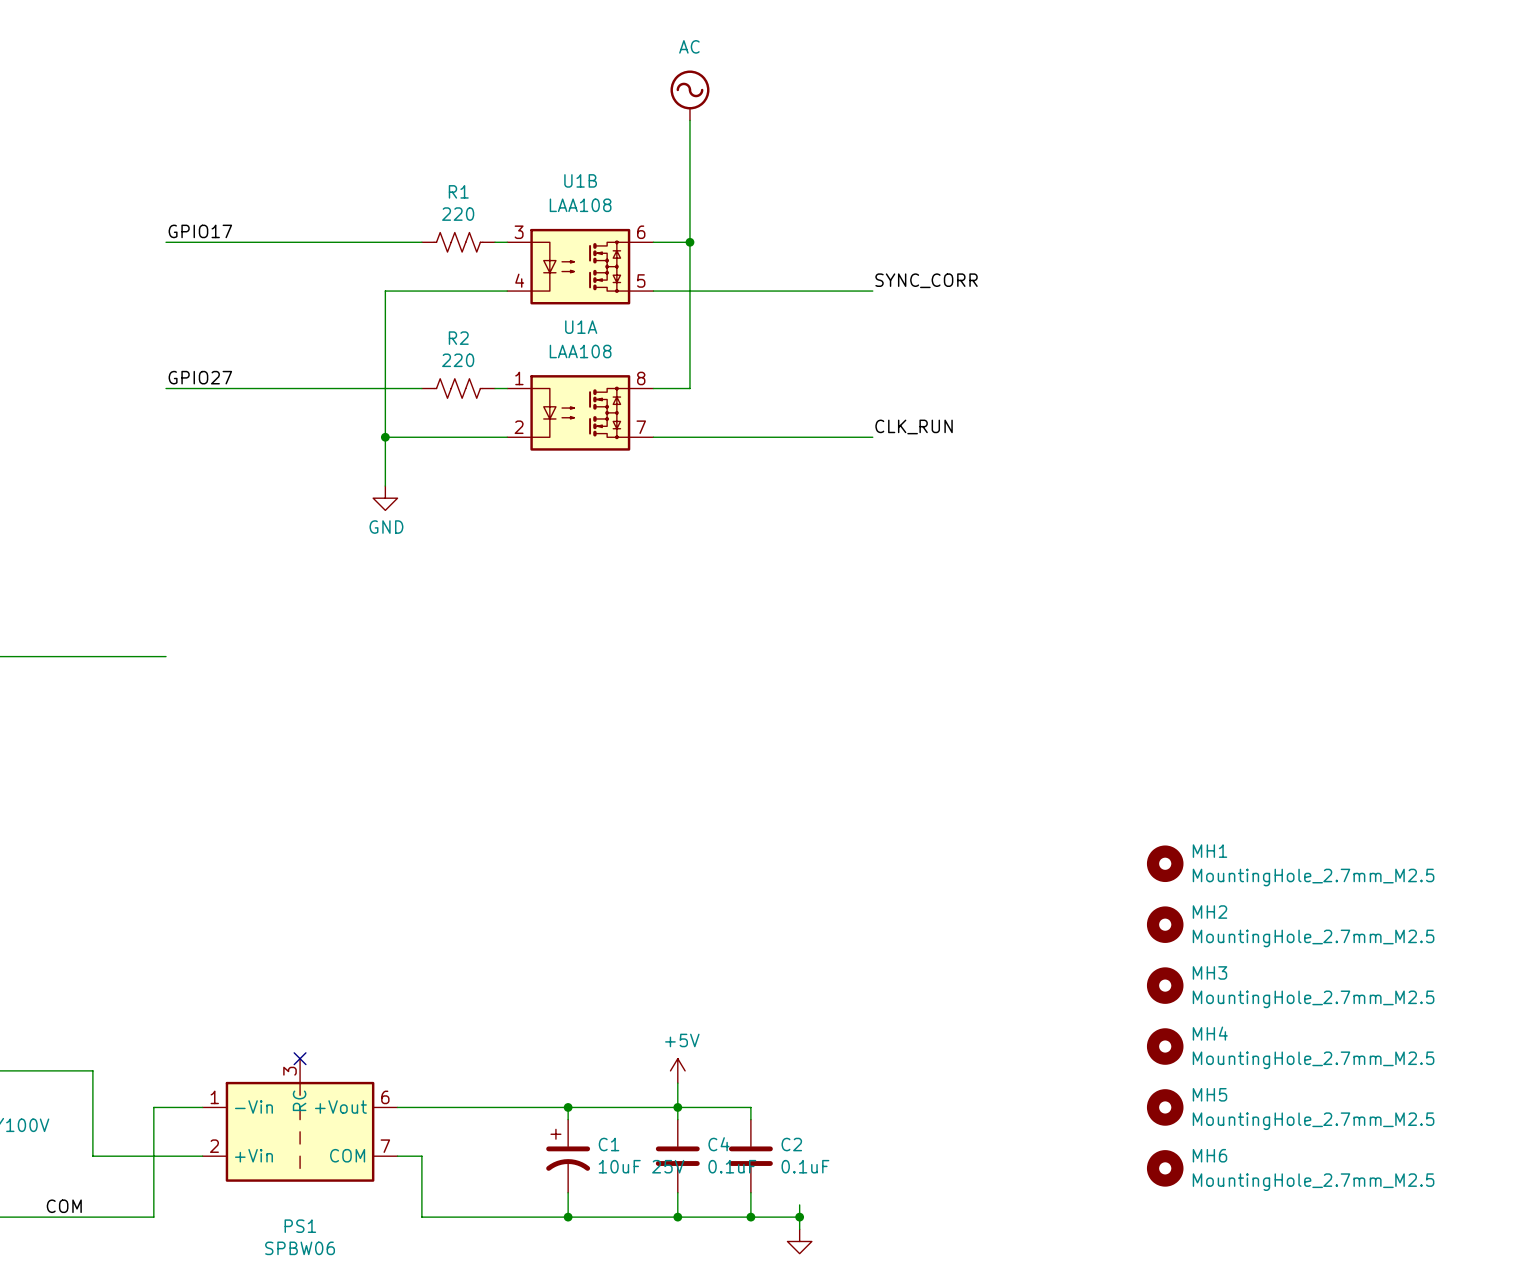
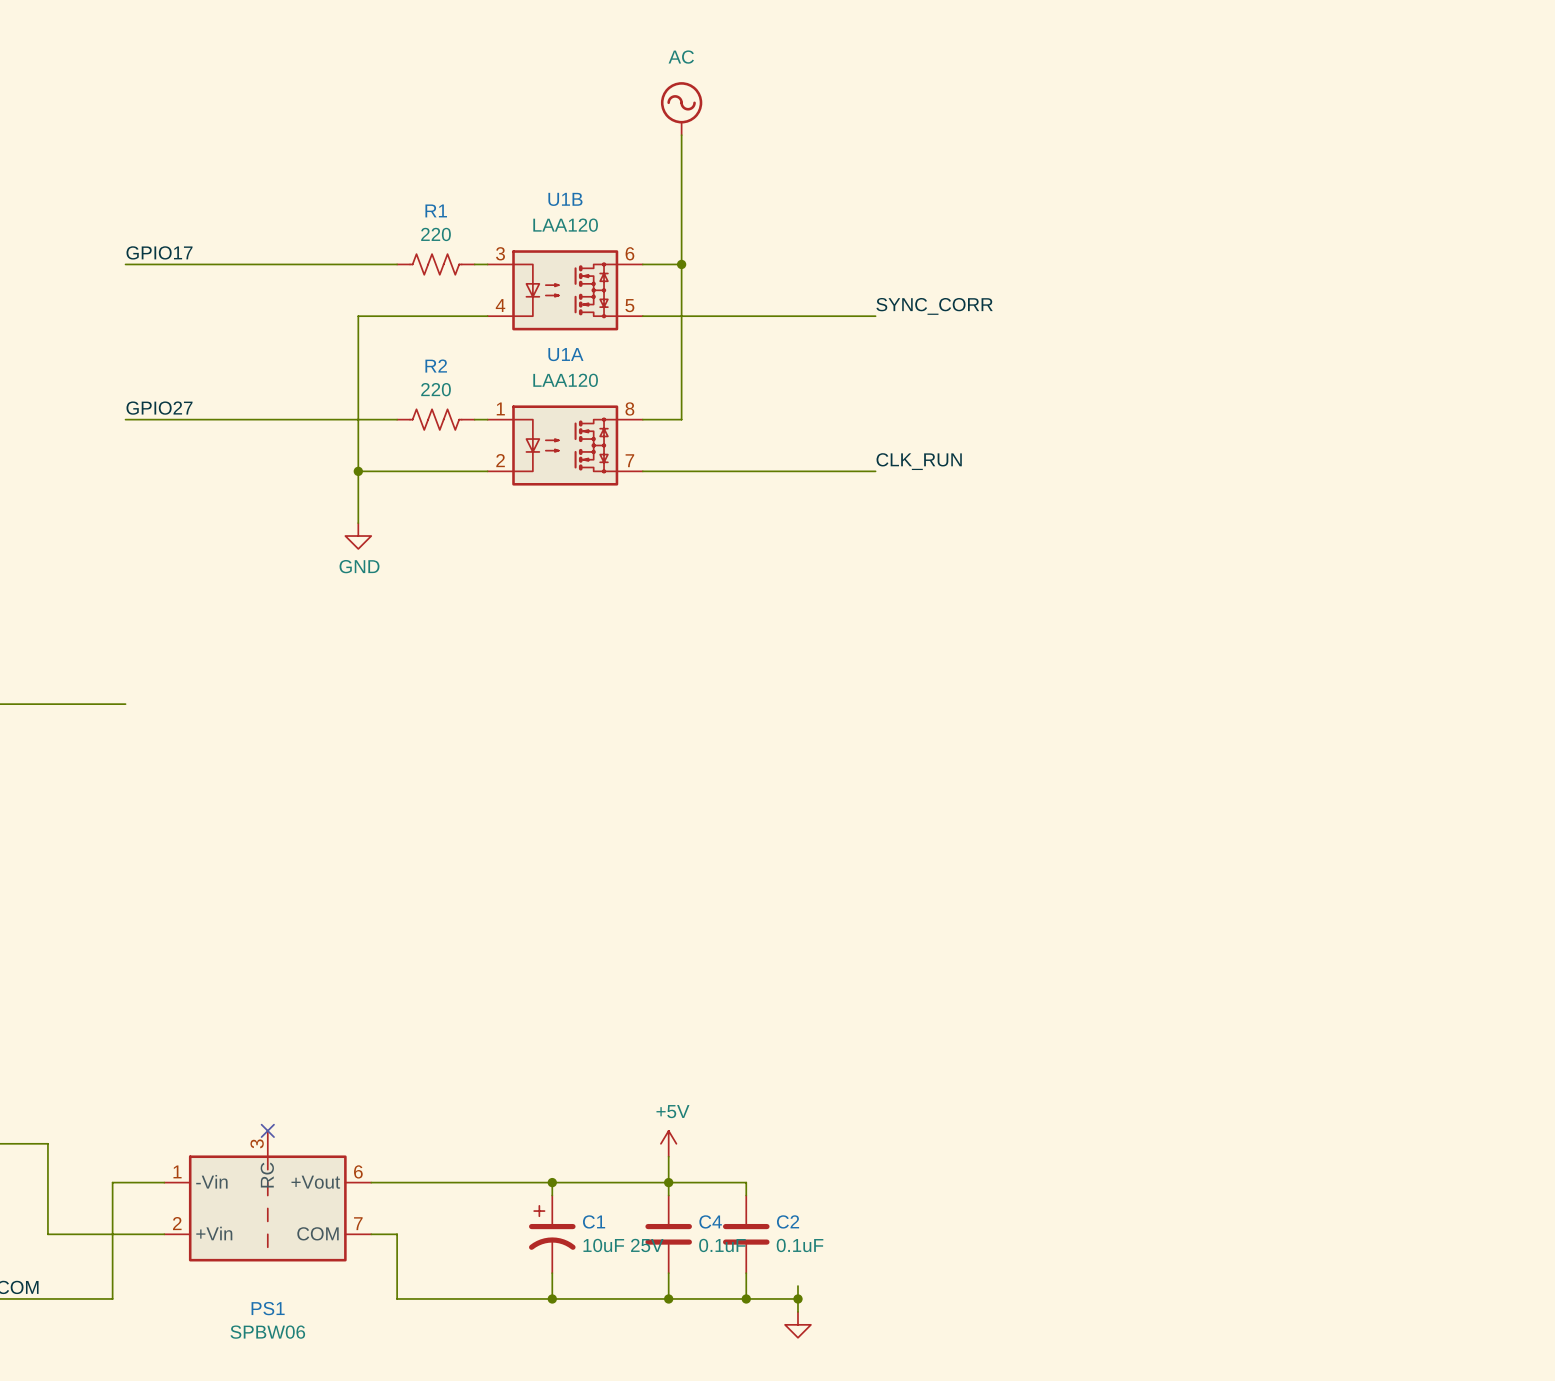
U1B value: LAA108 (580, 205) -> LAA120 (565, 225)
U1A value: LAA108 (580, 351) -> LAA120 (565, 380)
MH1: MountingHole_2.7mm_M2.5 (1165, 863) -> none
MH2: MountingHole_2.7mm_M2.5 (1165, 924) -> none
MH3: MountingHole_2.7mm_M2.5 (1165, 985) -> none
MH4: MountingHole_2.7mm_M2.5 (1165, 1046) -> none
MH5: MountingHole_2.7mm_M2.5 (1165, 1107) -> none
MH6: MountingHole_2.7mm_M2.5 (1165, 1168) -> none

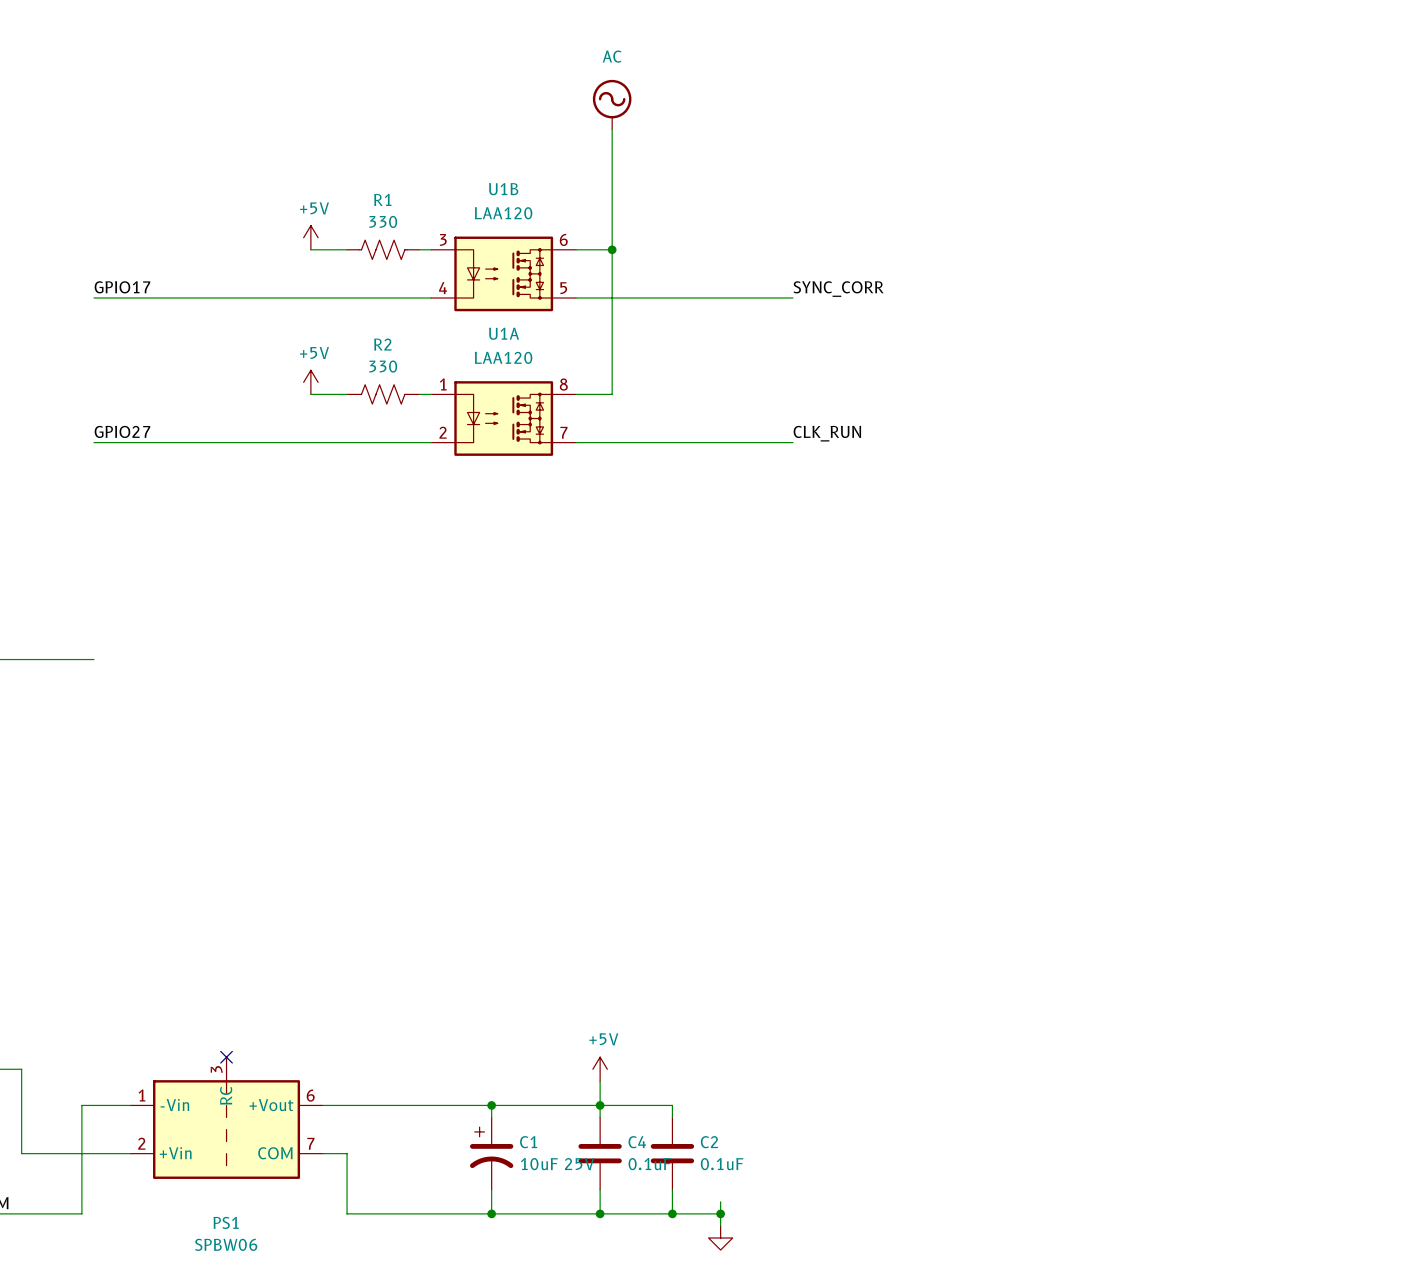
R1 value: 220 (436, 234) -> 330 (383, 221)
power symbol: none -> +5V (310, 237)
label position: GPIO17 (159, 252) -> GPIO17 (122, 287)
wire: (125, 264) (358, 264) -> none
wire: (358, 316) (358, 523) -> (310, 298) (93, 298)
R2 value: 220 (436, 389) -> 330 (383, 366)
power symbol: none -> +5V (310, 382)
label position: GPIO27 (159, 408) -> GPIO27 (122, 431)
wire: (125, 419) (358, 419) -> (93, 442) (310, 442)
junction: (358, 471) -> none
power symbol: GND (358, 536) -> none

